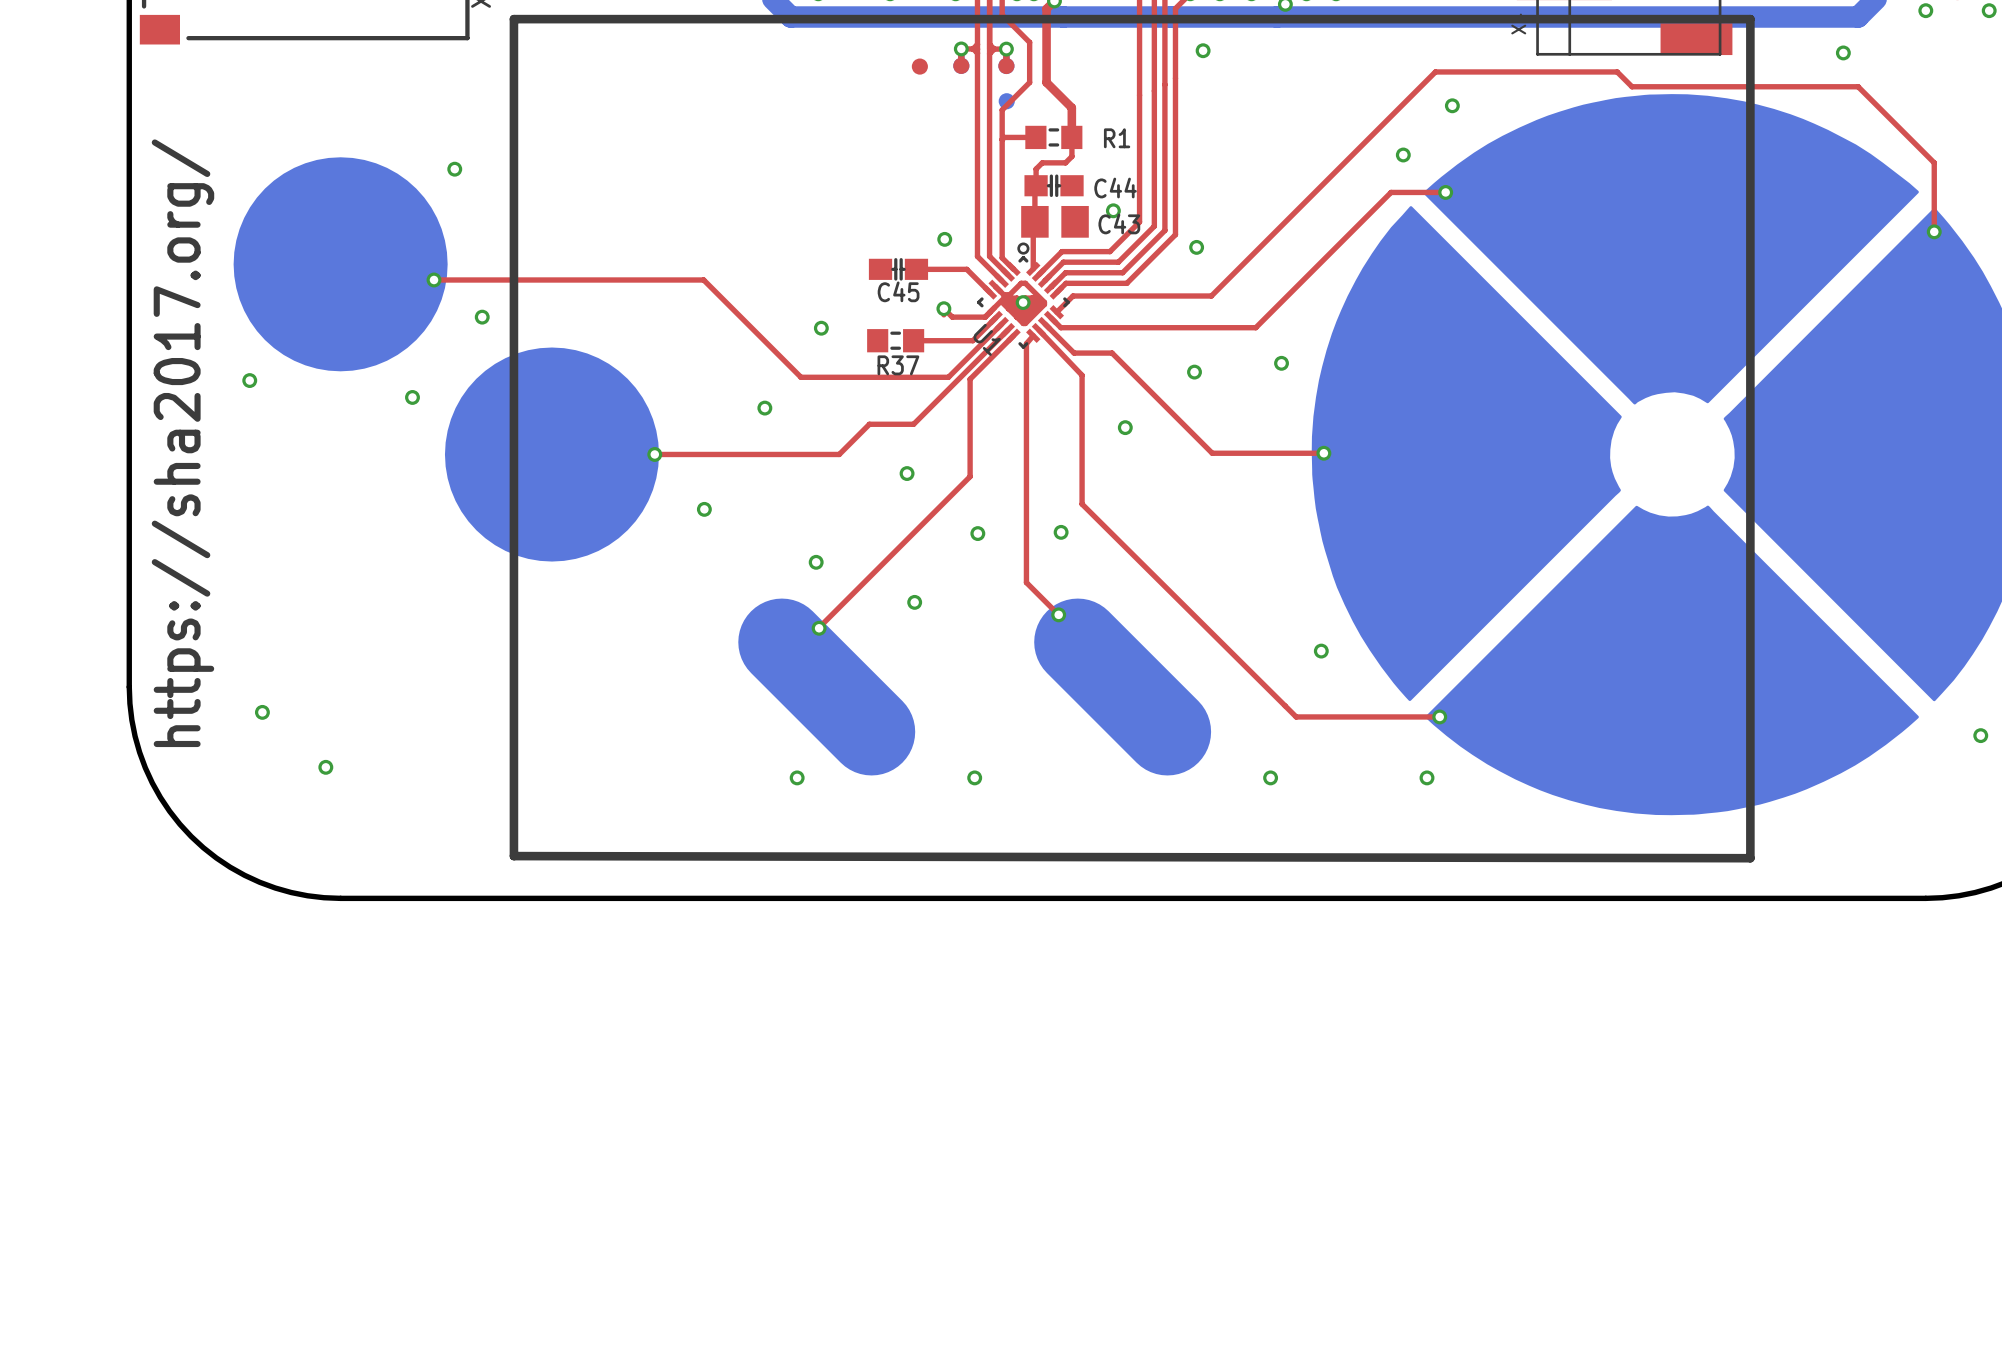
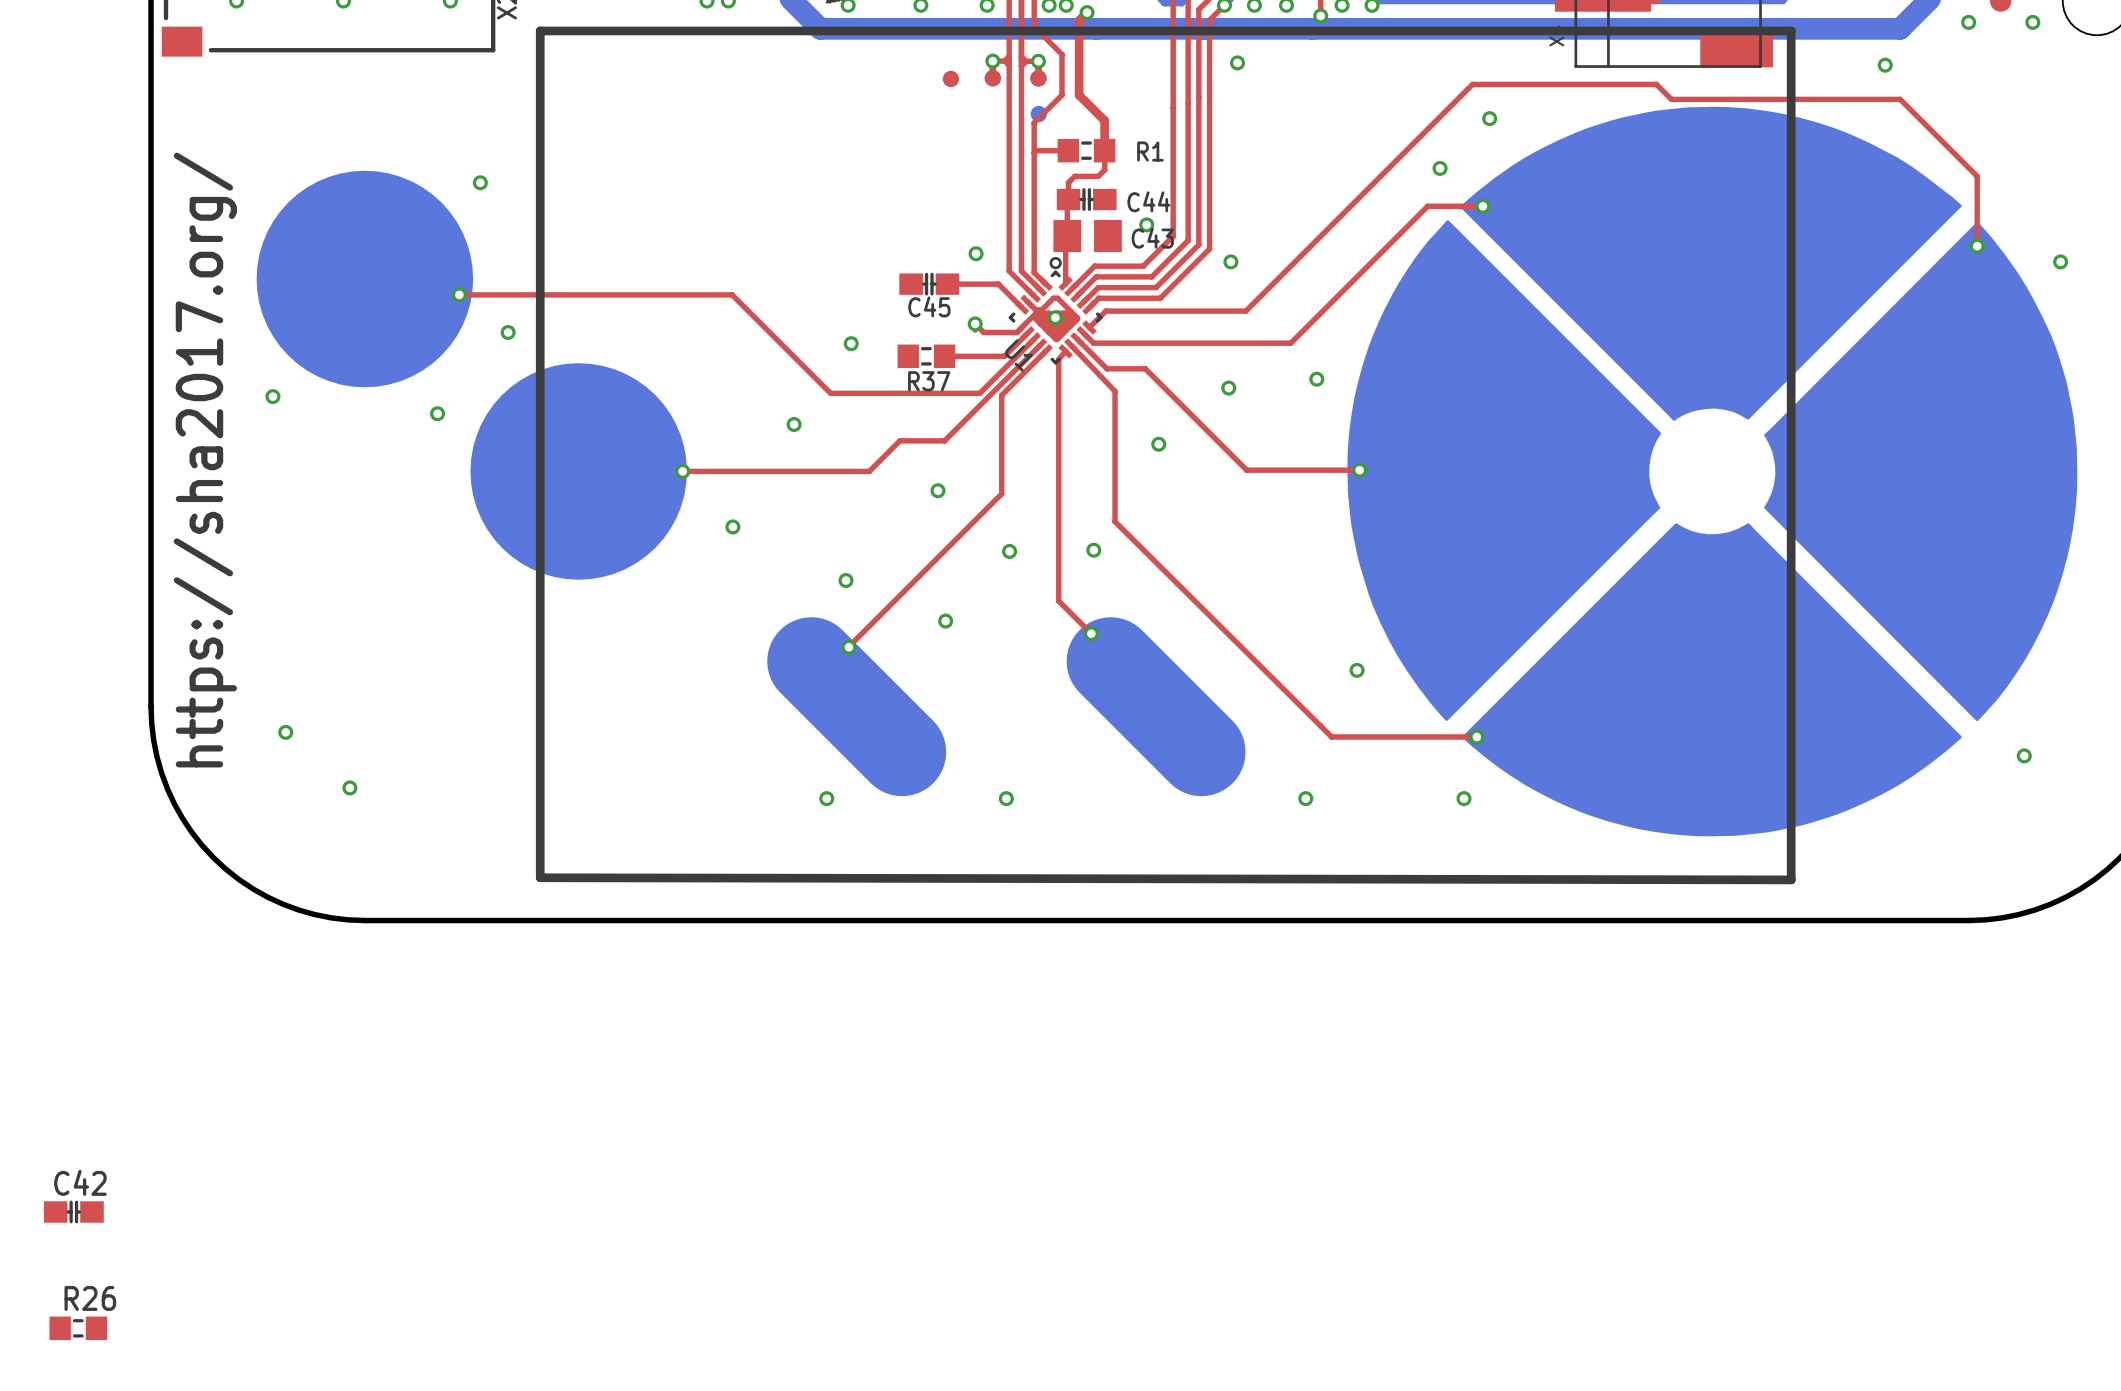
C42: none -> (73, 1211)
R26: none -> (78, 1328)

